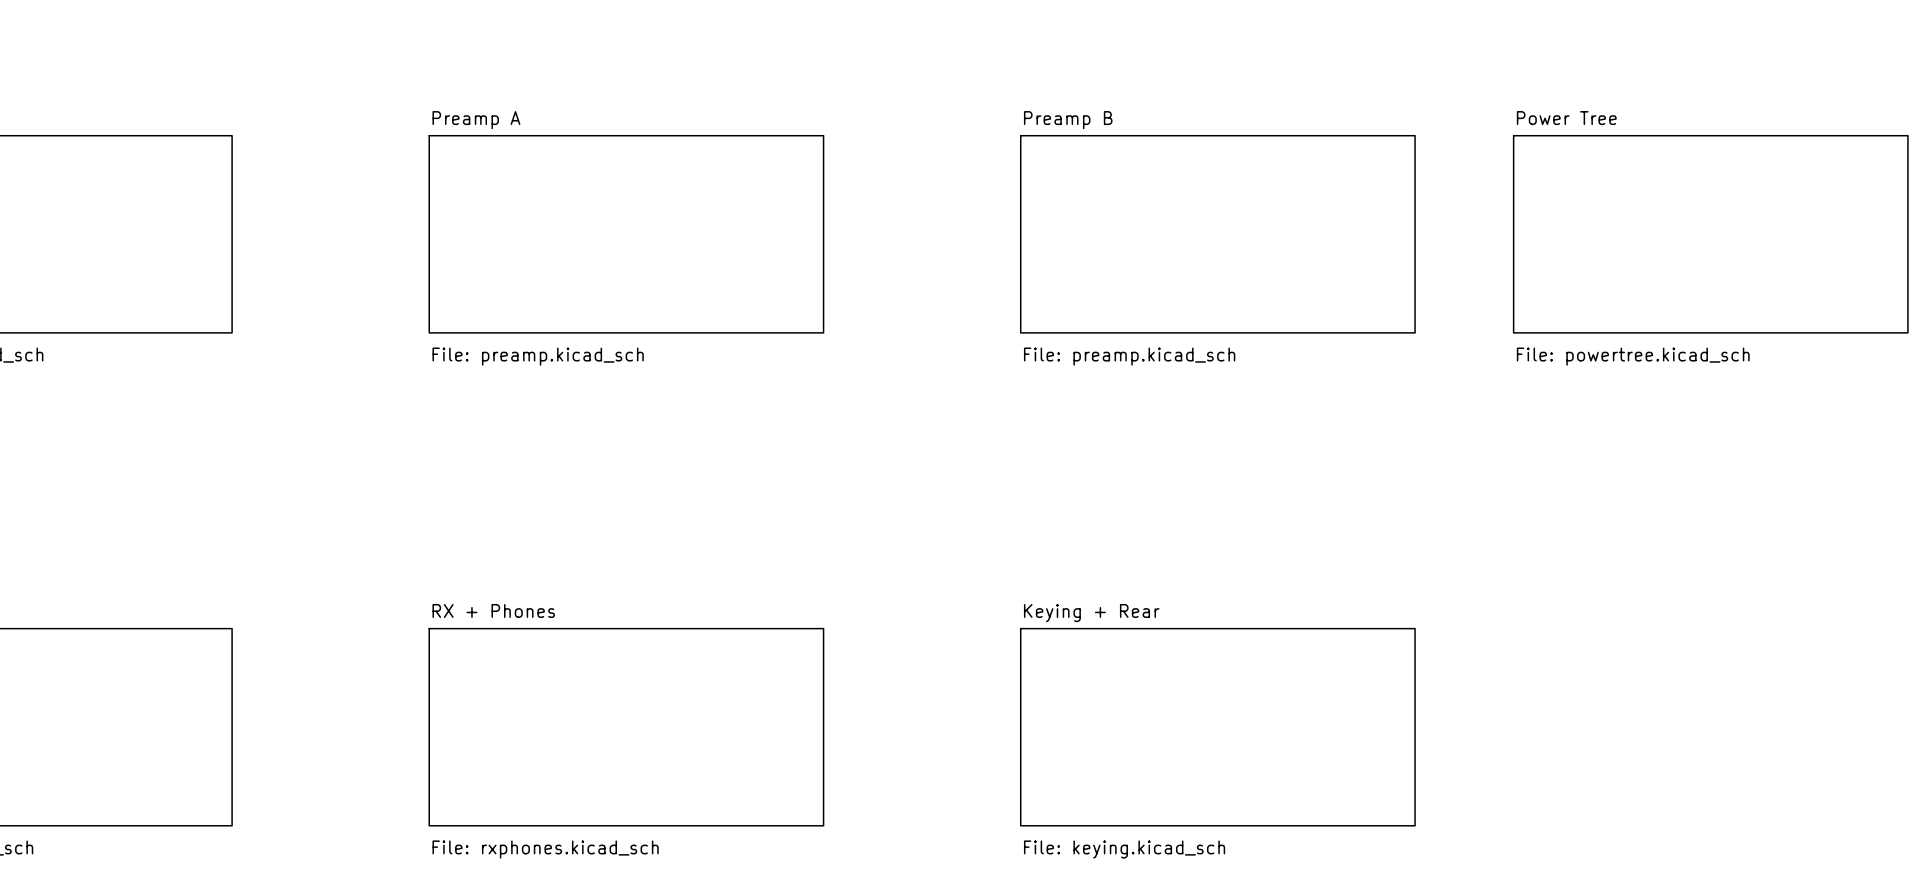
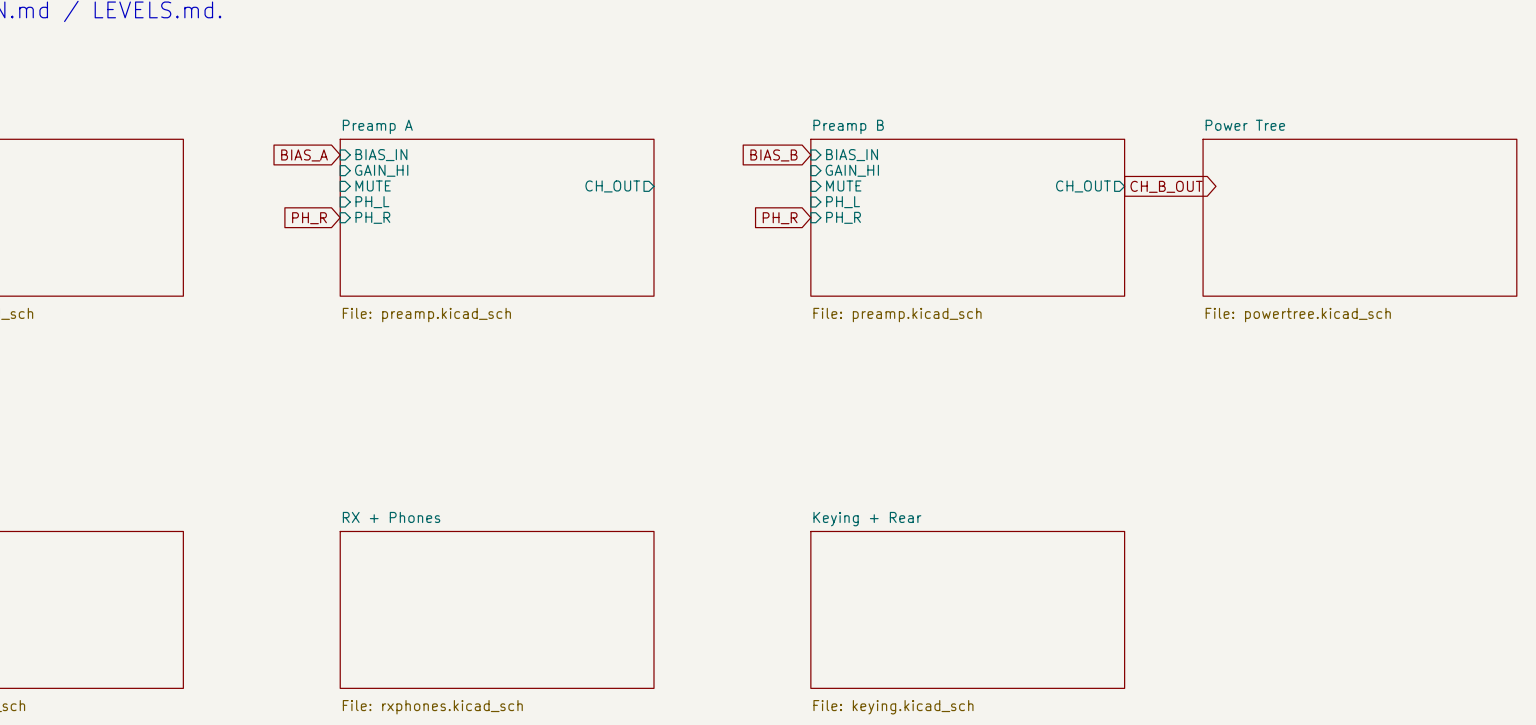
sheet pin: none -> BIAS_IN (381, 155)
sheet pin: none -> BIAS_IN (852, 155)
global label: none -> BIAS_A (304, 155)
global label: none -> BIAS_B (773, 155)
sheet pin: none -> GAIN_HI (381, 170)
sheet pin: none -> GAIN_HI (852, 170)
sheet pin: none -> MUTE (373, 185)
sheet pin: none -> CH_OUT (612, 186)
sheet pin: none -> MUTE (843, 185)
sheet pin: none -> CH_OUT (1083, 186)
global label: none -> CH_B_OUT (1166, 186)
sheet pin: none -> PH_L (372, 202)
sheet pin: none -> PH_L (843, 202)
global label: none -> PH_R (309, 218)
sheet pin: none -> PH_R (372, 217)
global label: none -> PH_R (780, 218)
sheet pin: none -> PH_R (843, 217)

